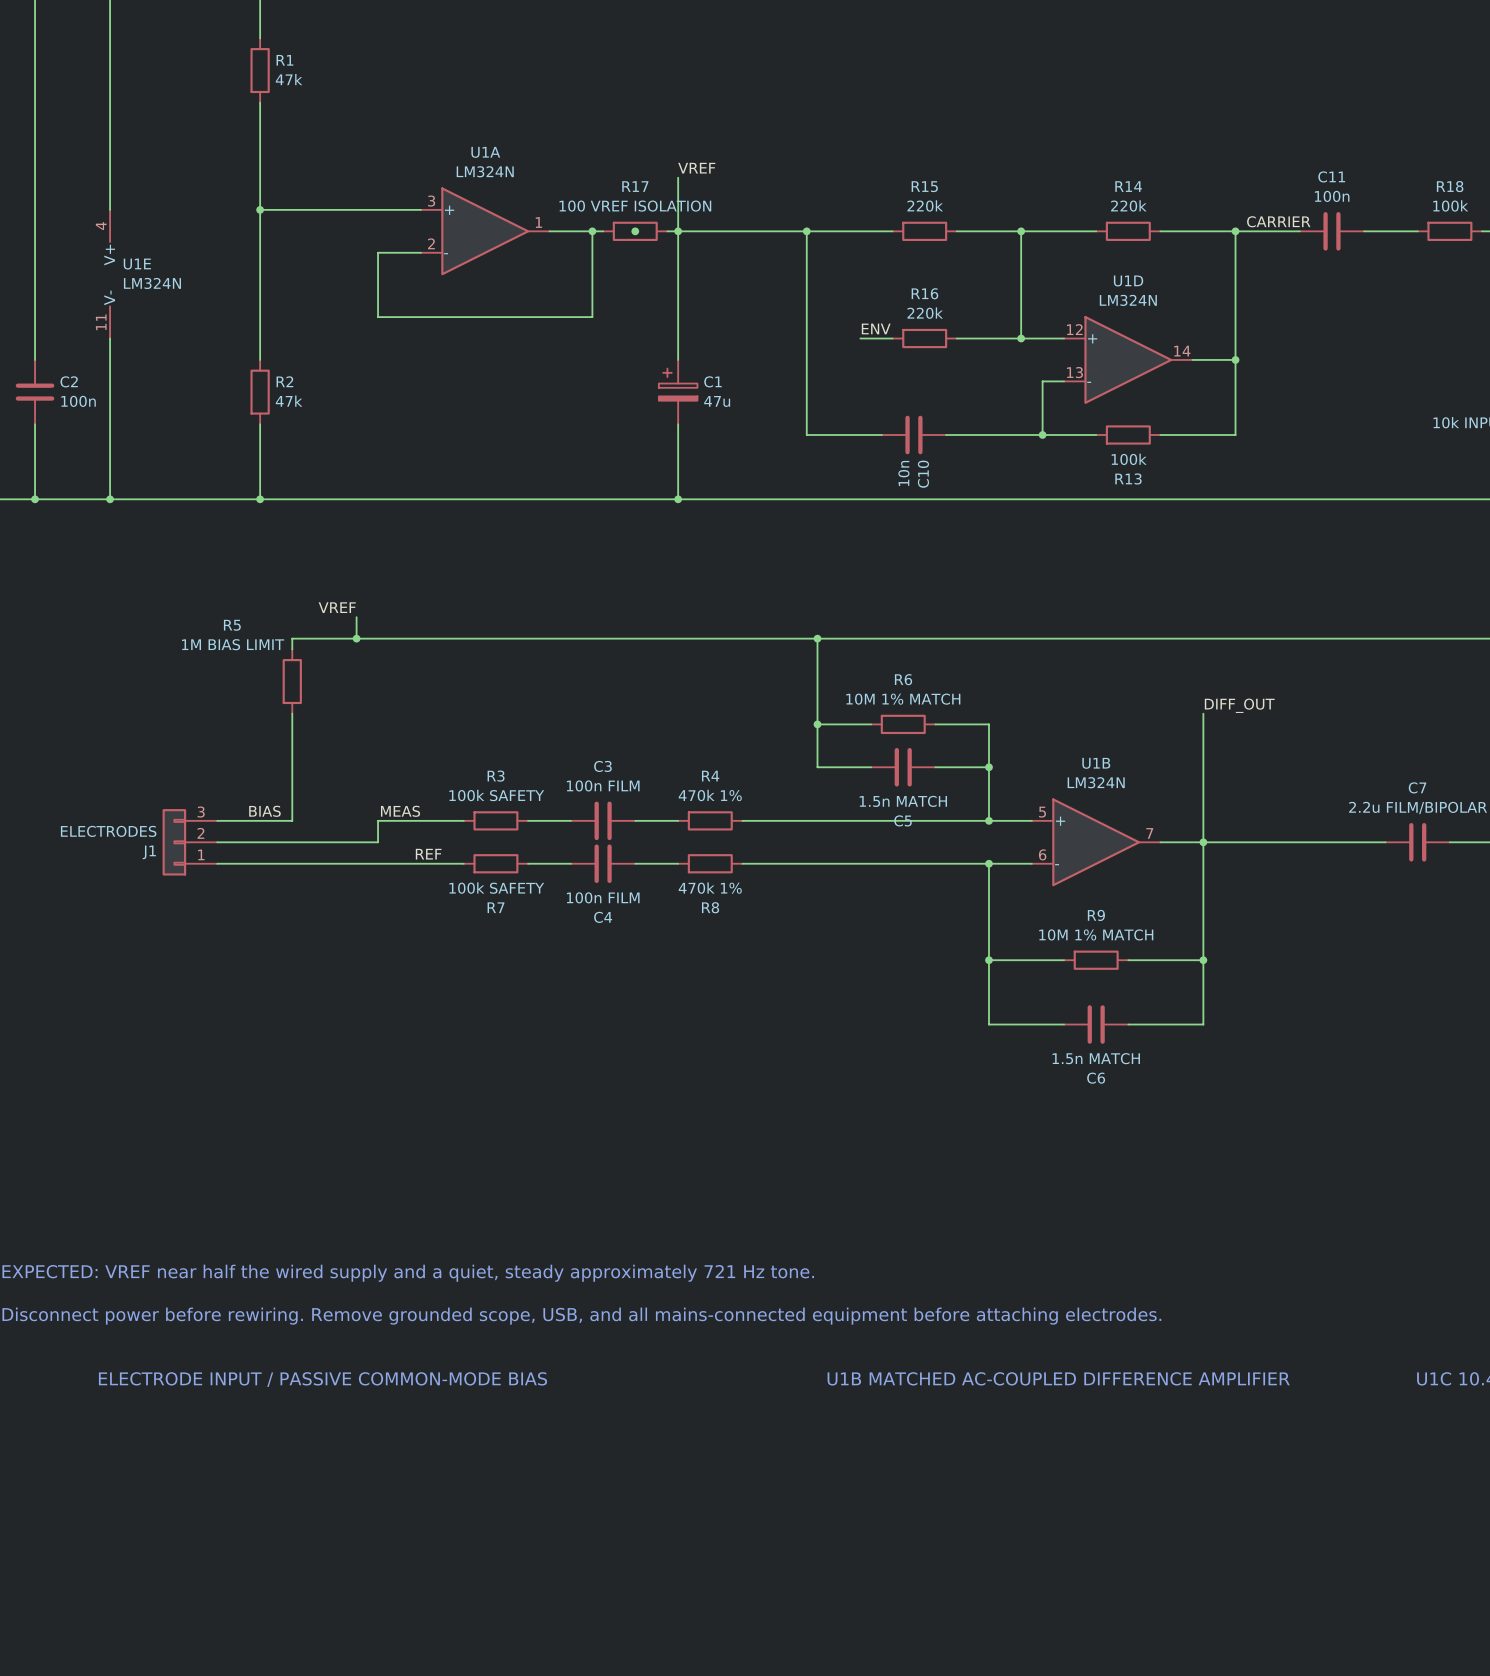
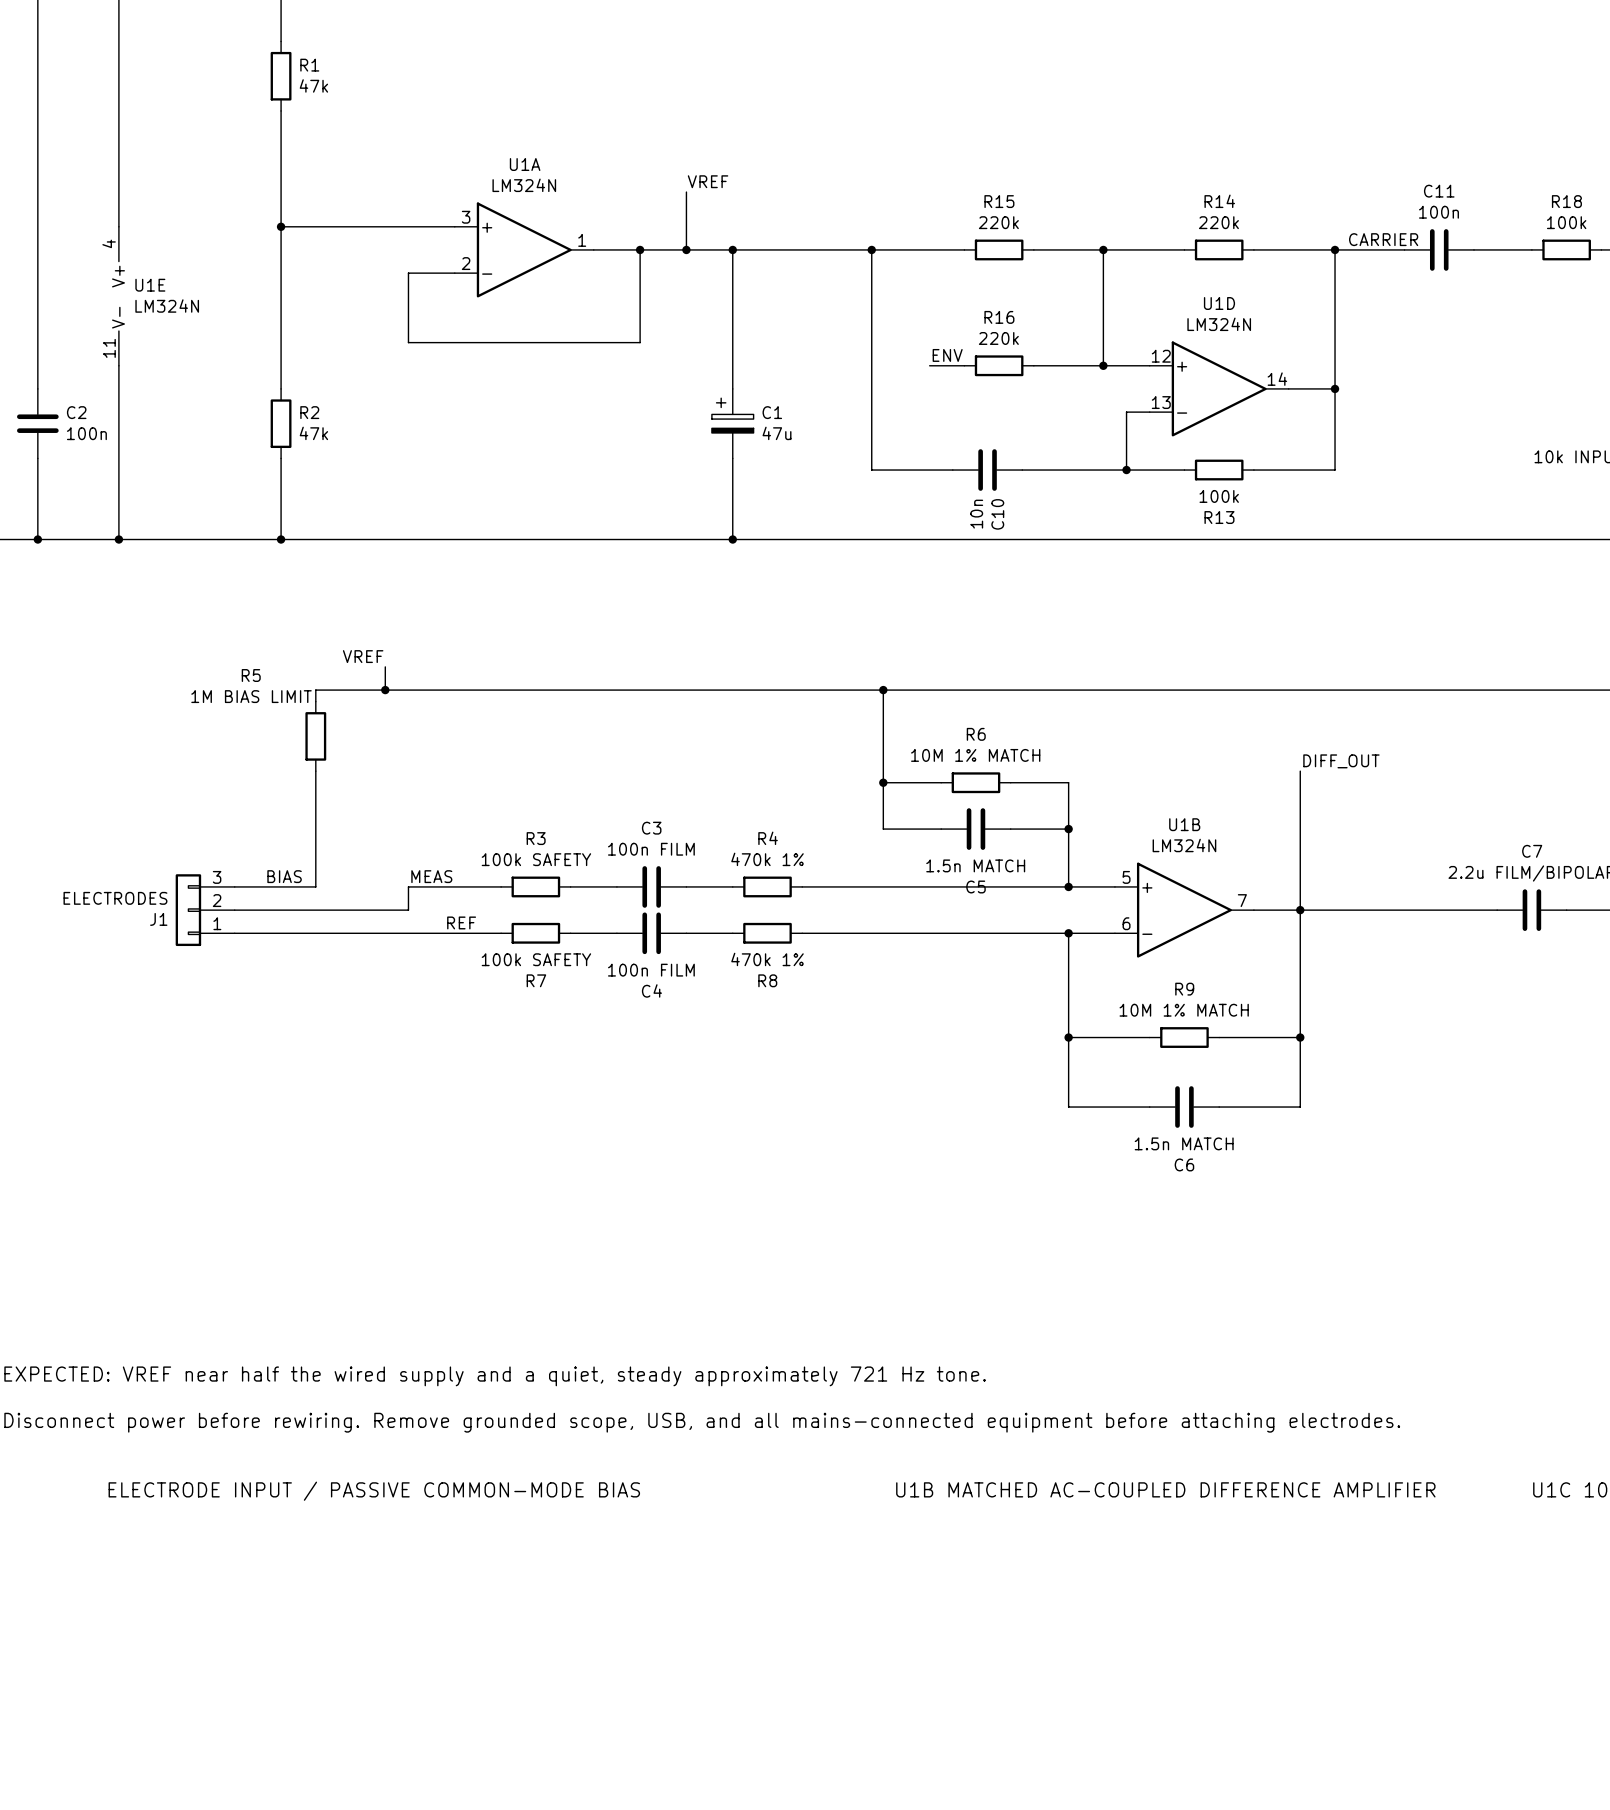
label position: VREF (696, 168) -> VREF (708, 181)
wire: (678, 177) (678, 231) -> (686, 192) (686, 249)
wire: none -> (651, 249) (721, 249)
R17: 100 VREF ISOLATION (635, 231) -> none

